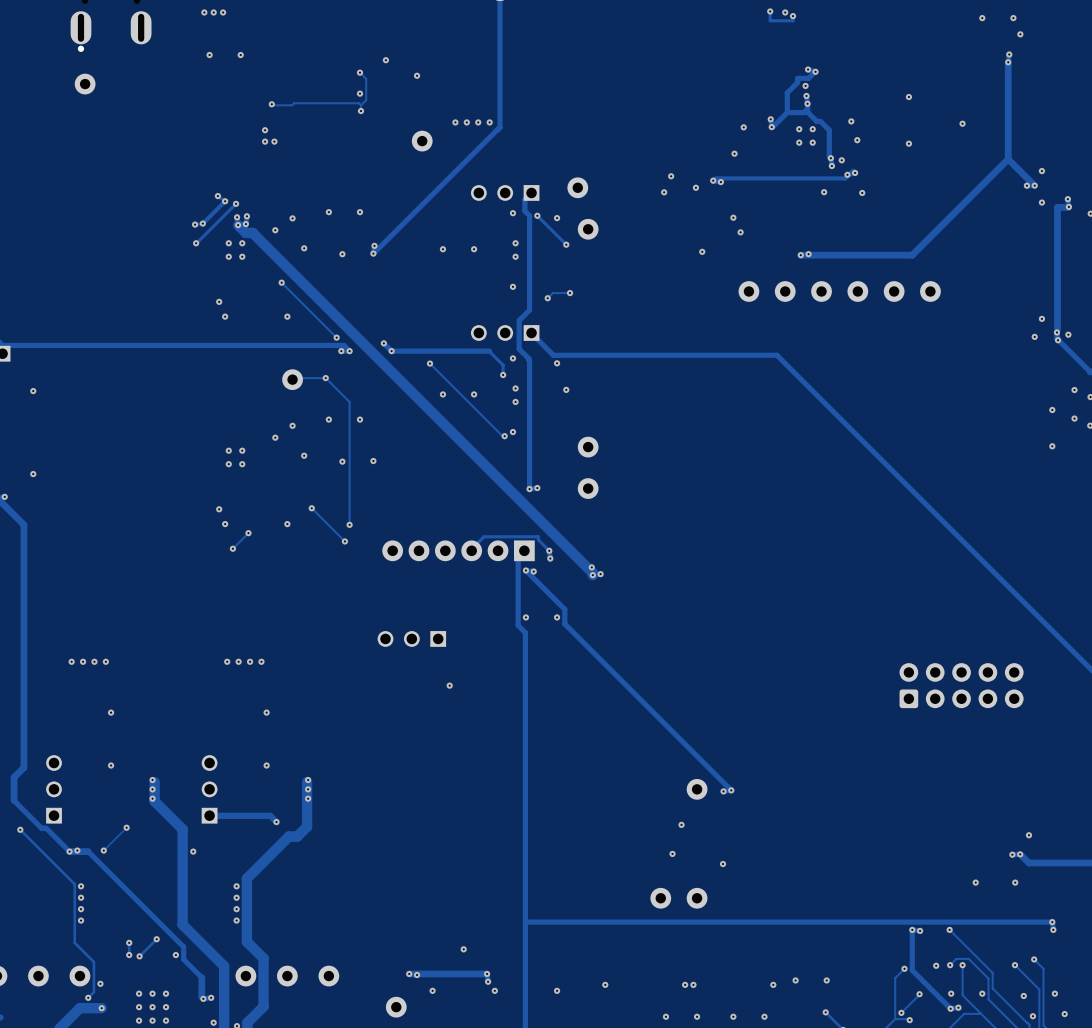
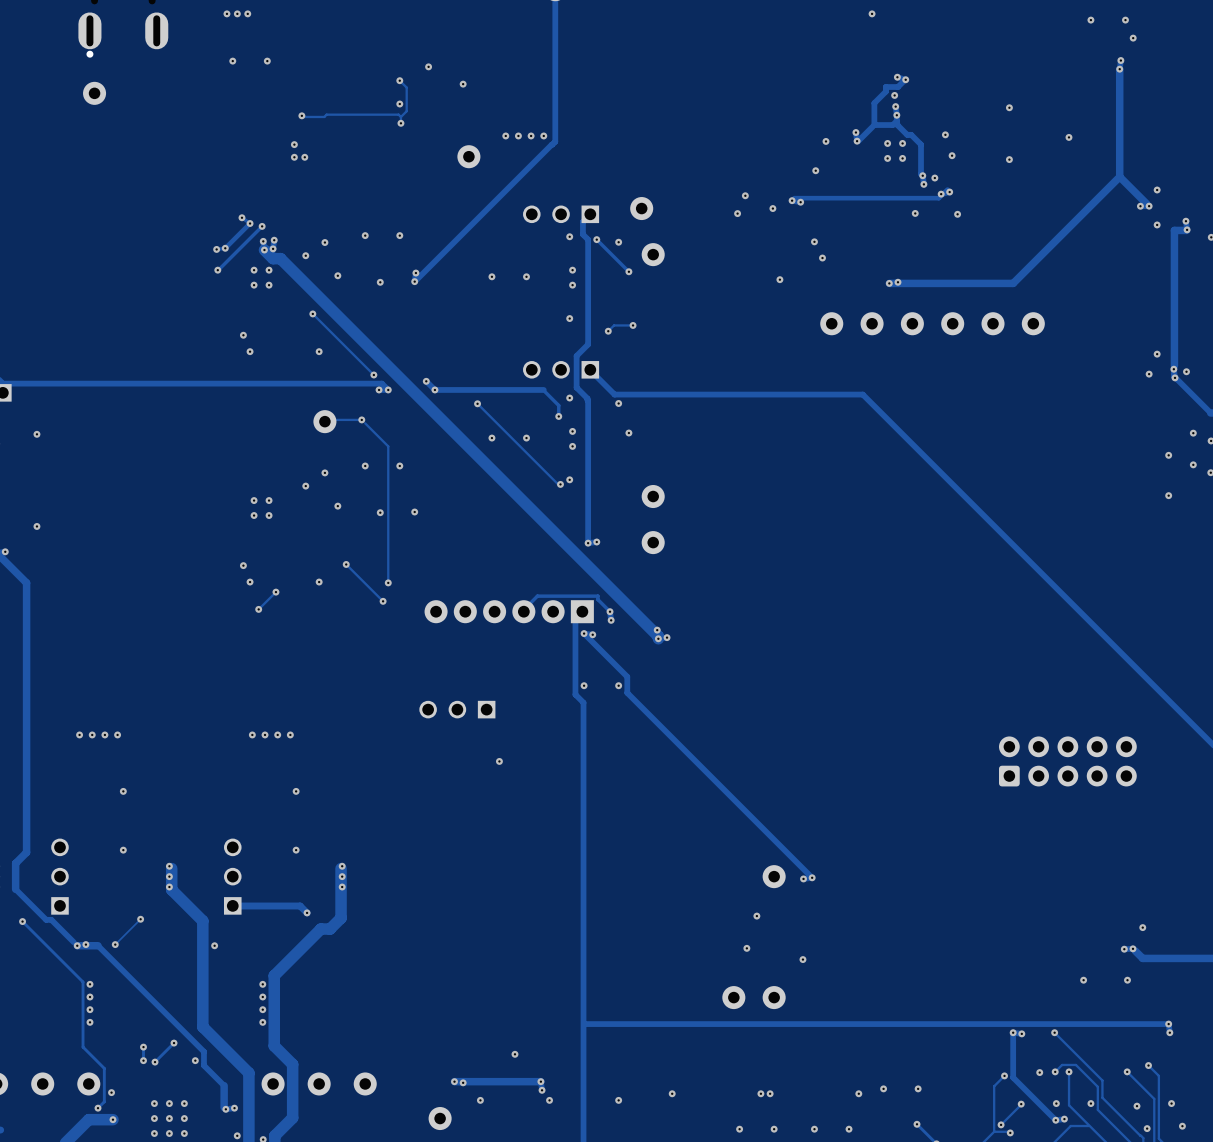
track: (770, 11) (770, 20) (793, 20) (793, 16) -> none
via: (770, 11) -> none
via: (793, 16) -> none

